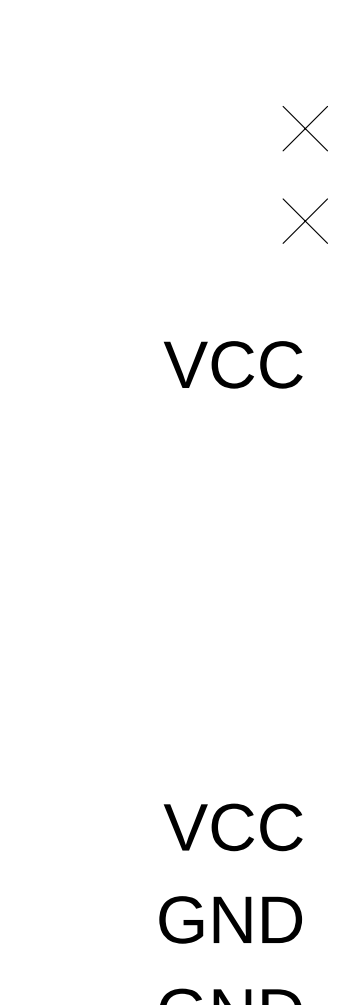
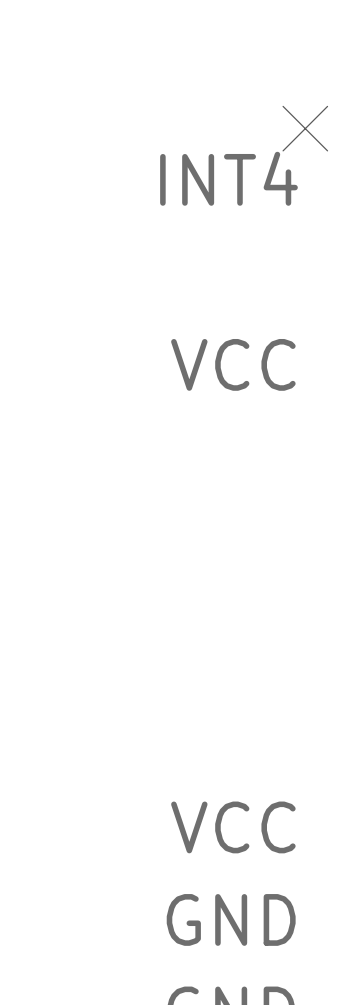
label: none -> INT4 (228, 178)
no-connect mark: (305, 221) -> none

